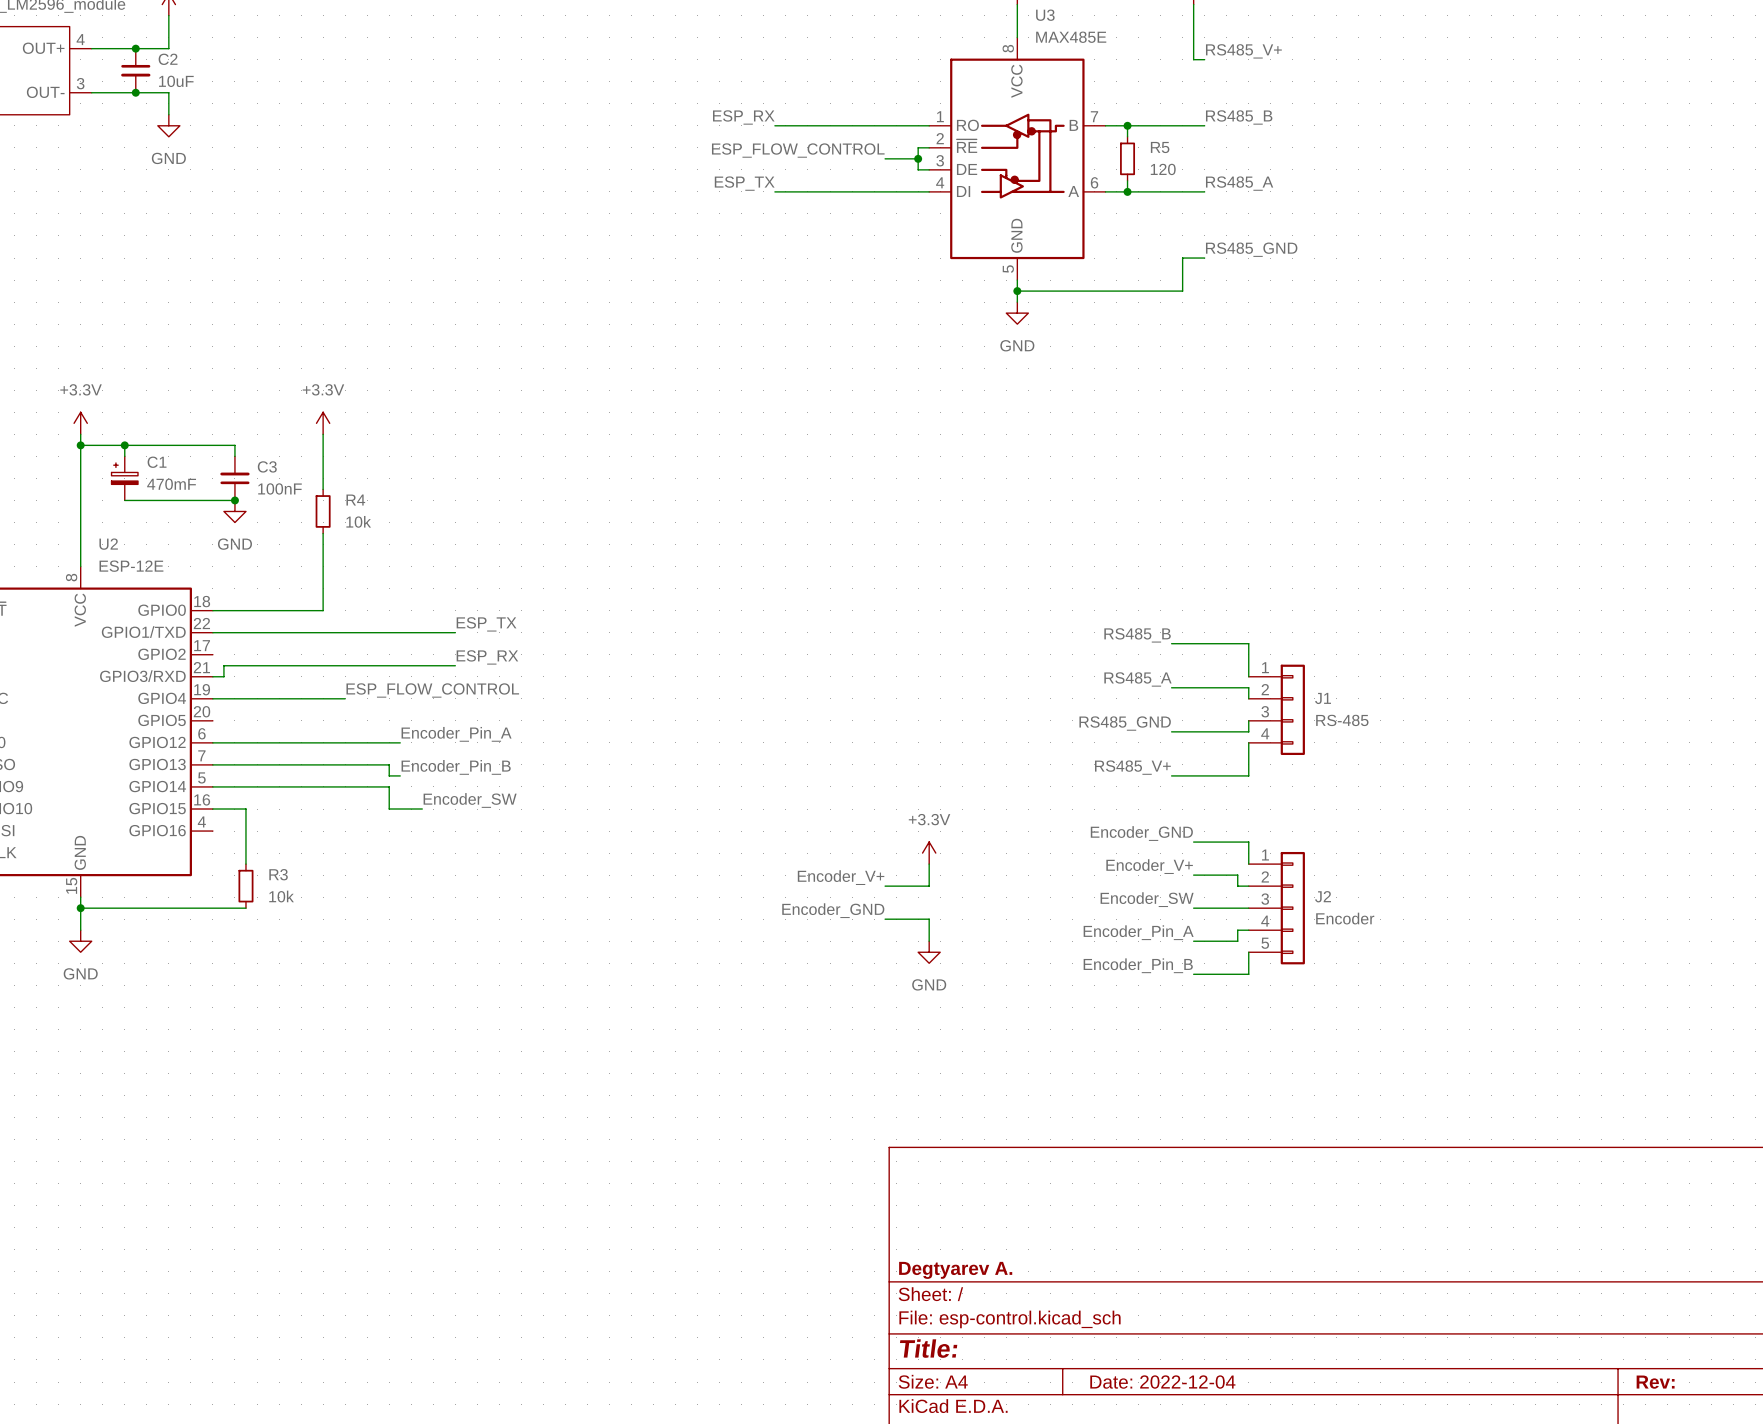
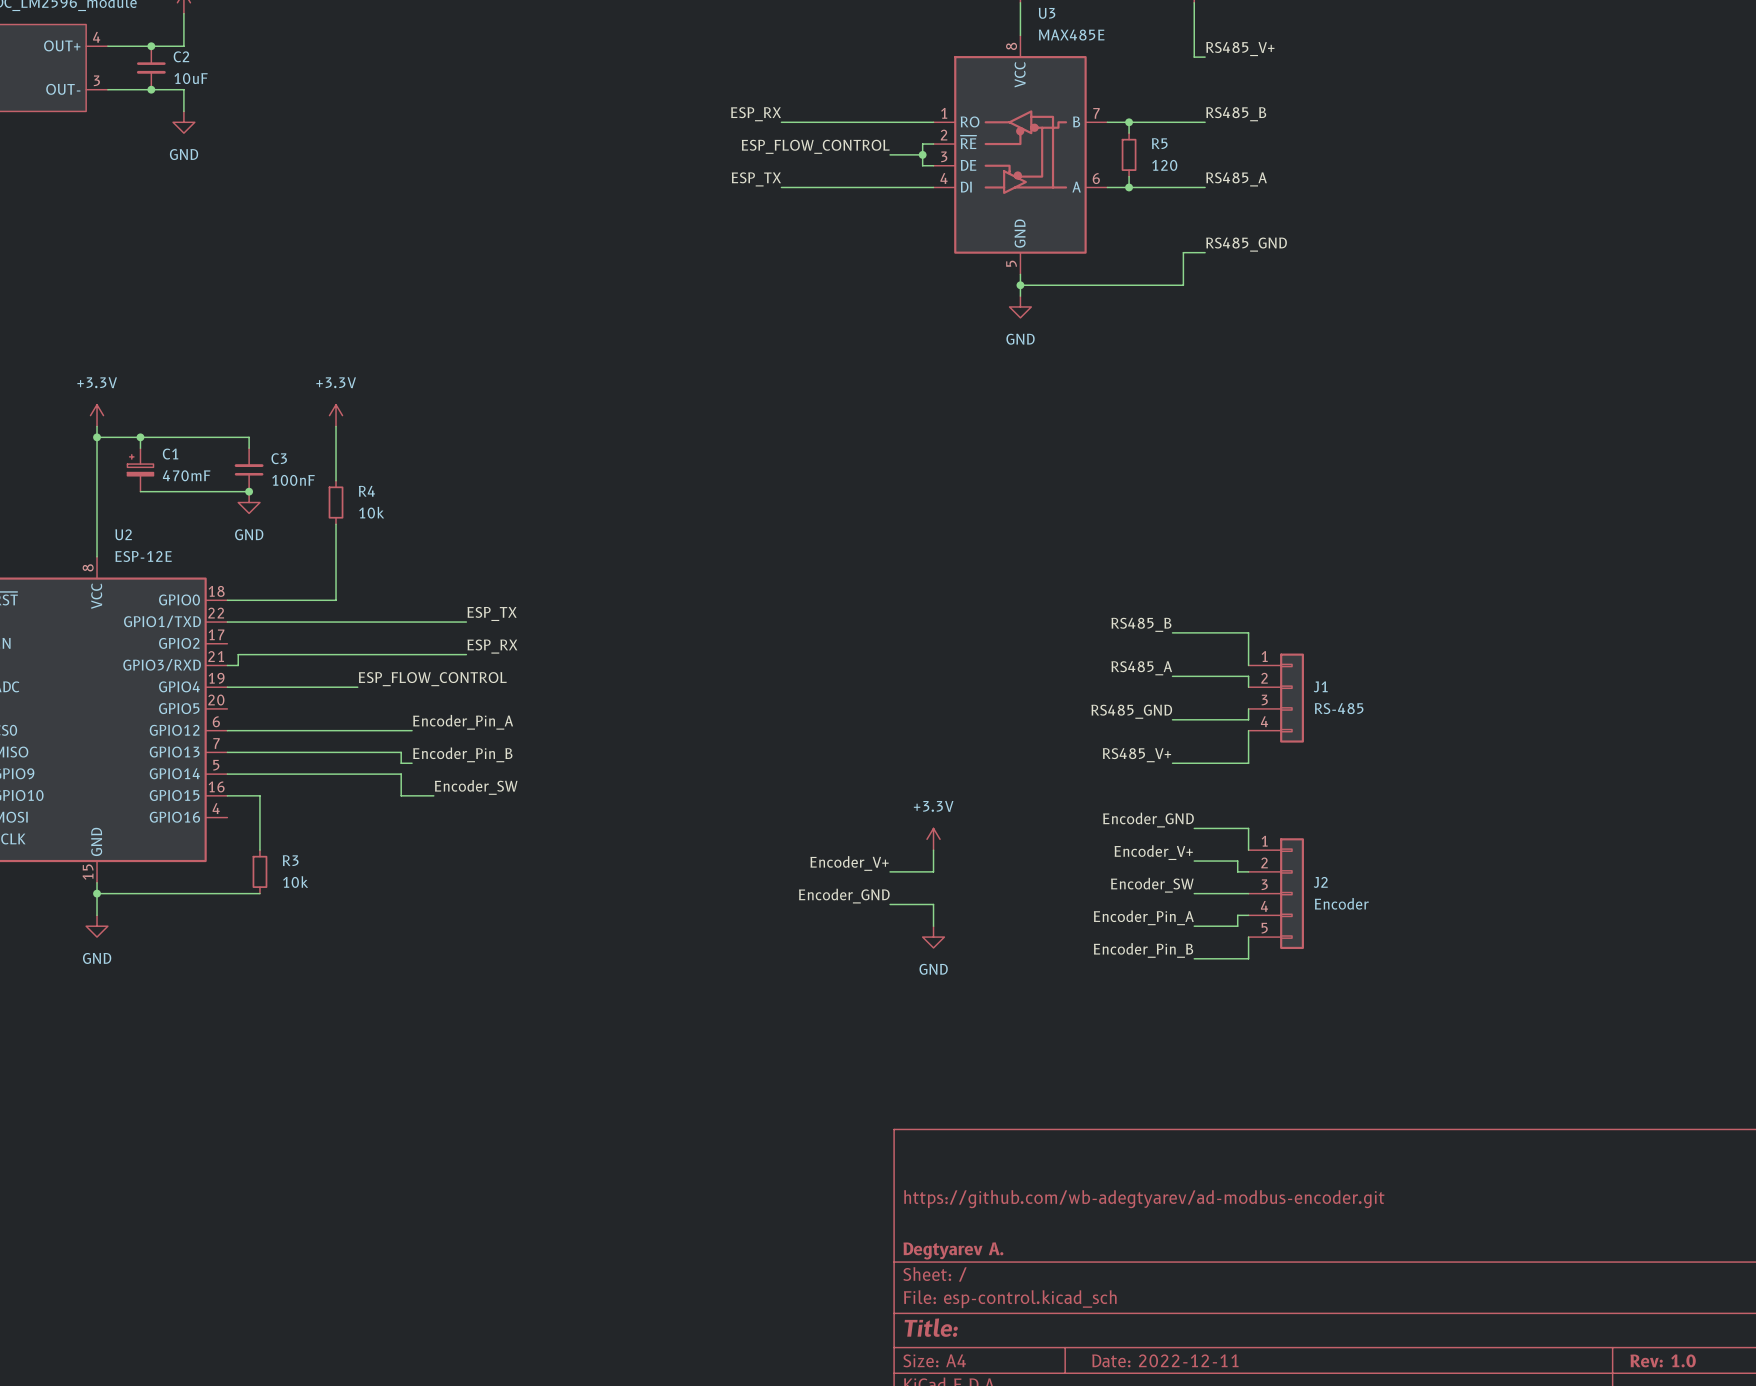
title block: none -> https://github.com/wb-adegtyarev/ad-modbus-encoder.git (1144, 1199)
title block: Date: 2022-12-04 (1162, 1382) -> Date: 2022-12-11 (1165, 1360)
title block: Rev: (1655, 1382) -> Rev: 1.0 (1663, 1360)

